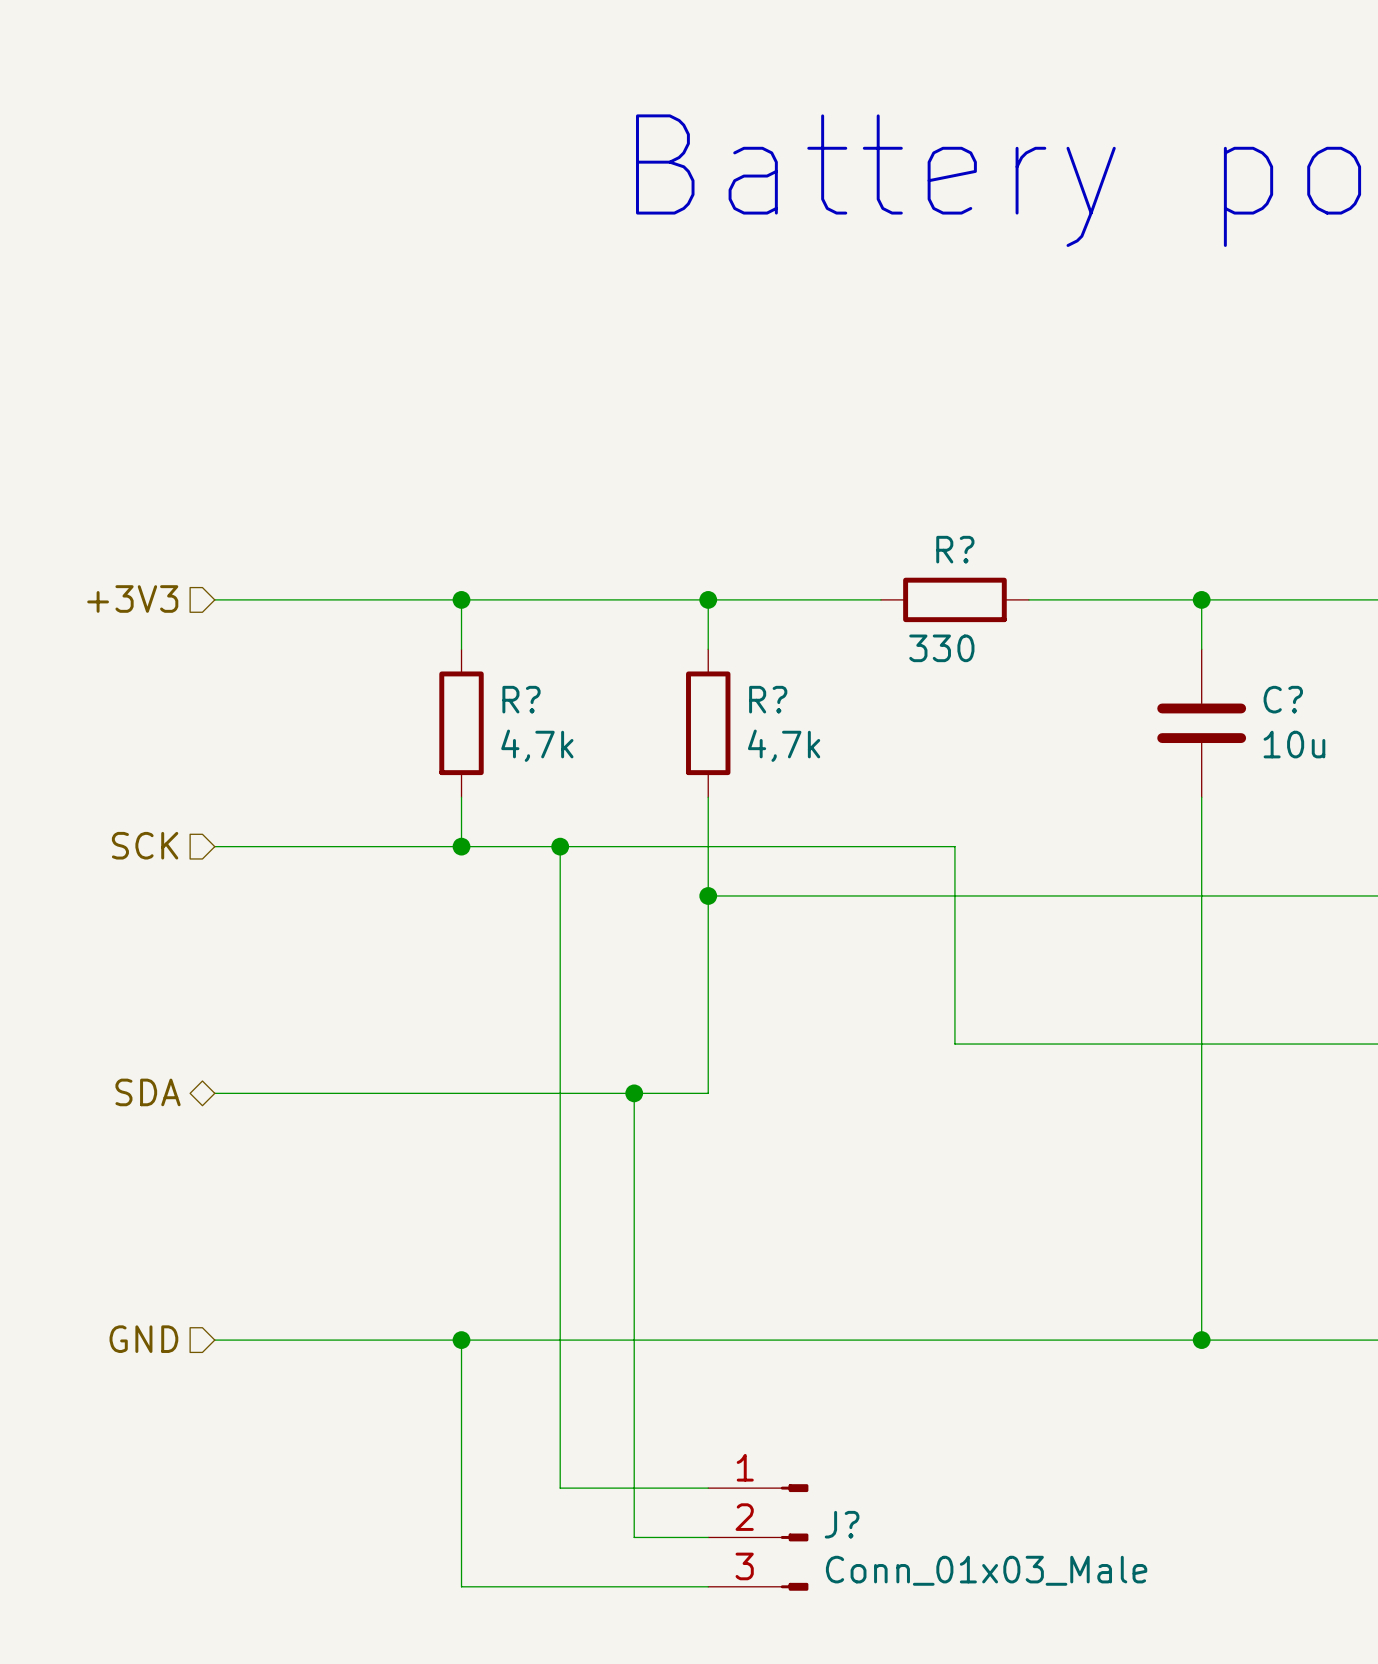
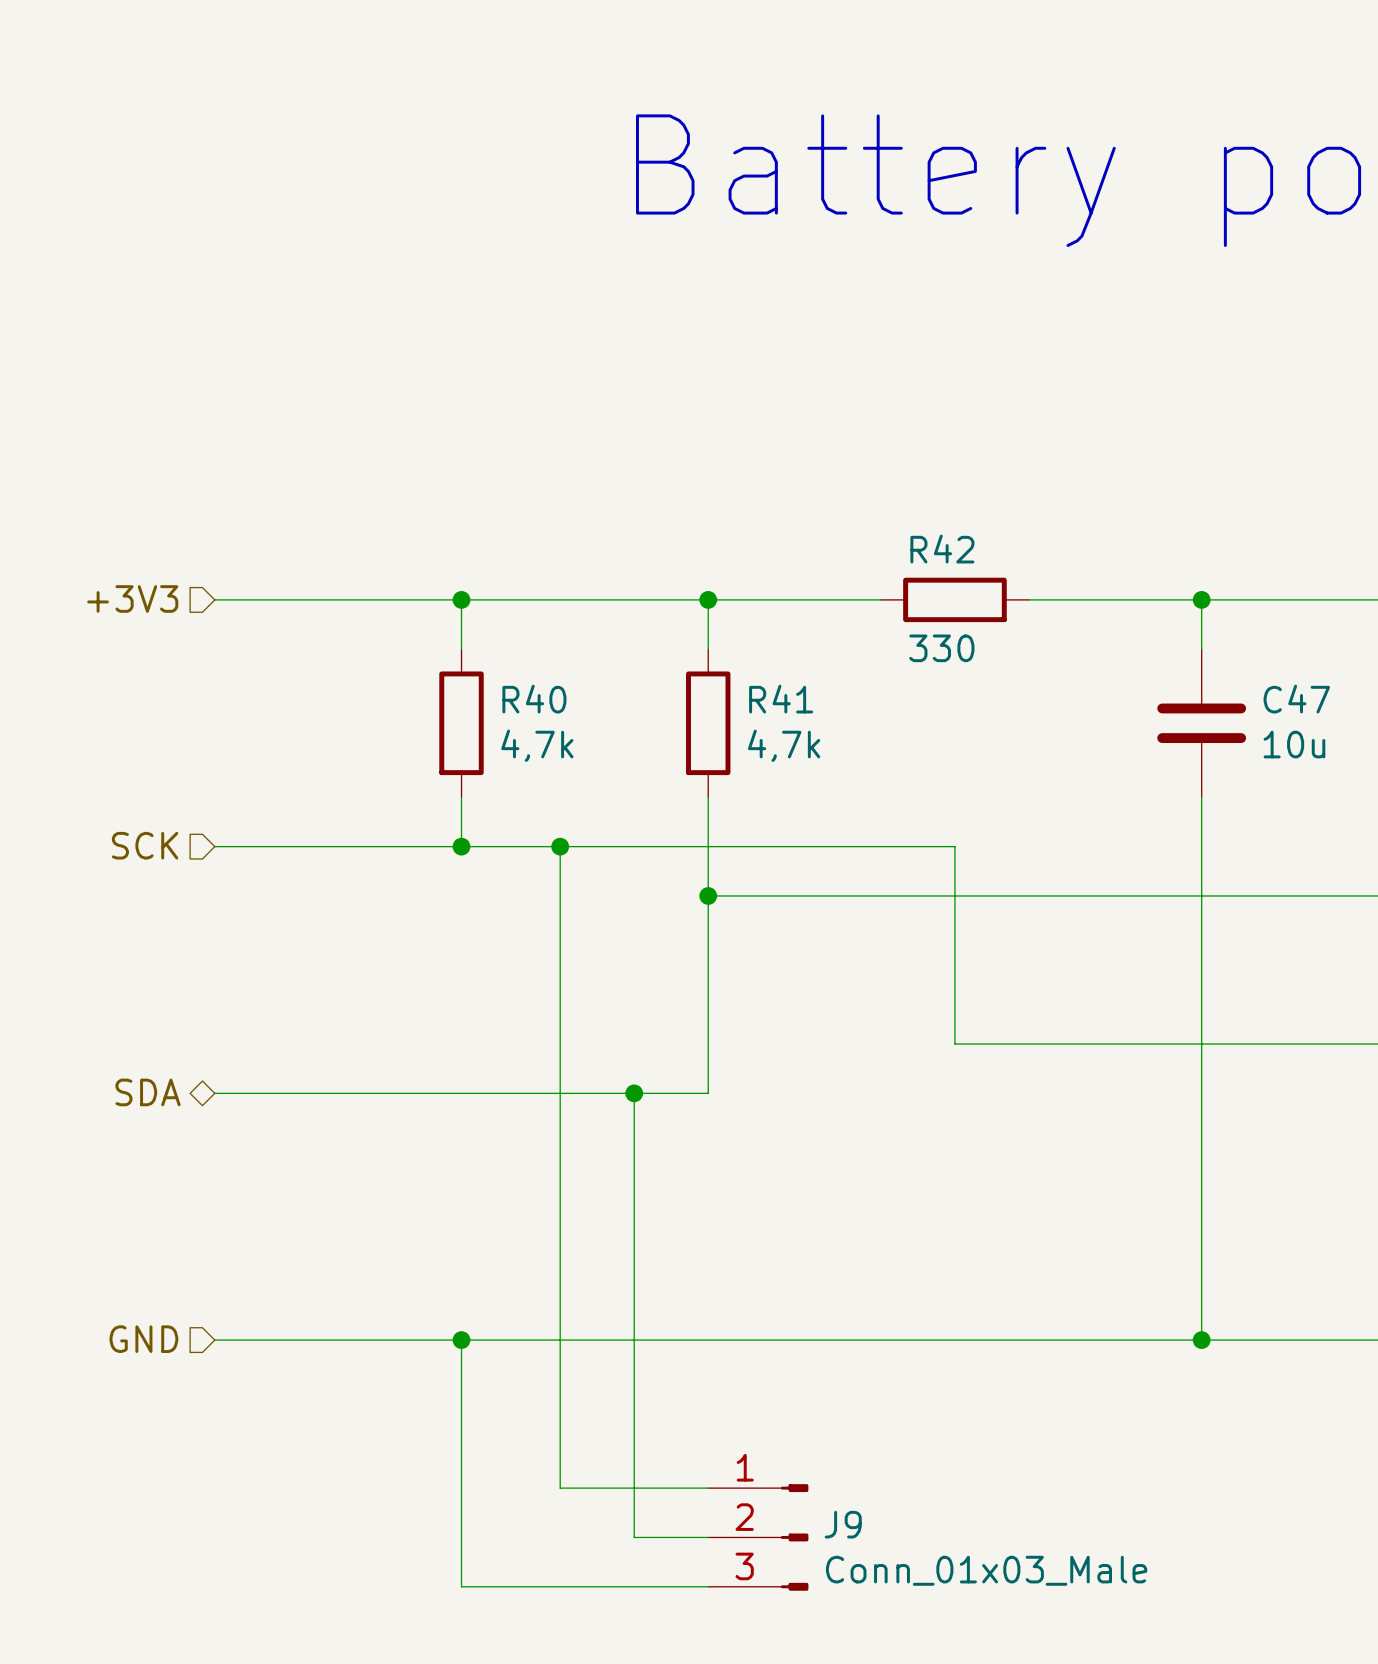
R? name: R? (955, 549) -> R42 (942, 549)
R? name: R? (521, 699) -> R40 (534, 699)
R? name: R? (768, 699) -> R41 (781, 699)
C? name: C? (1283, 699) -> C47 (1296, 699)
J? name: J? (842, 1524) -> J9 (843, 1524)

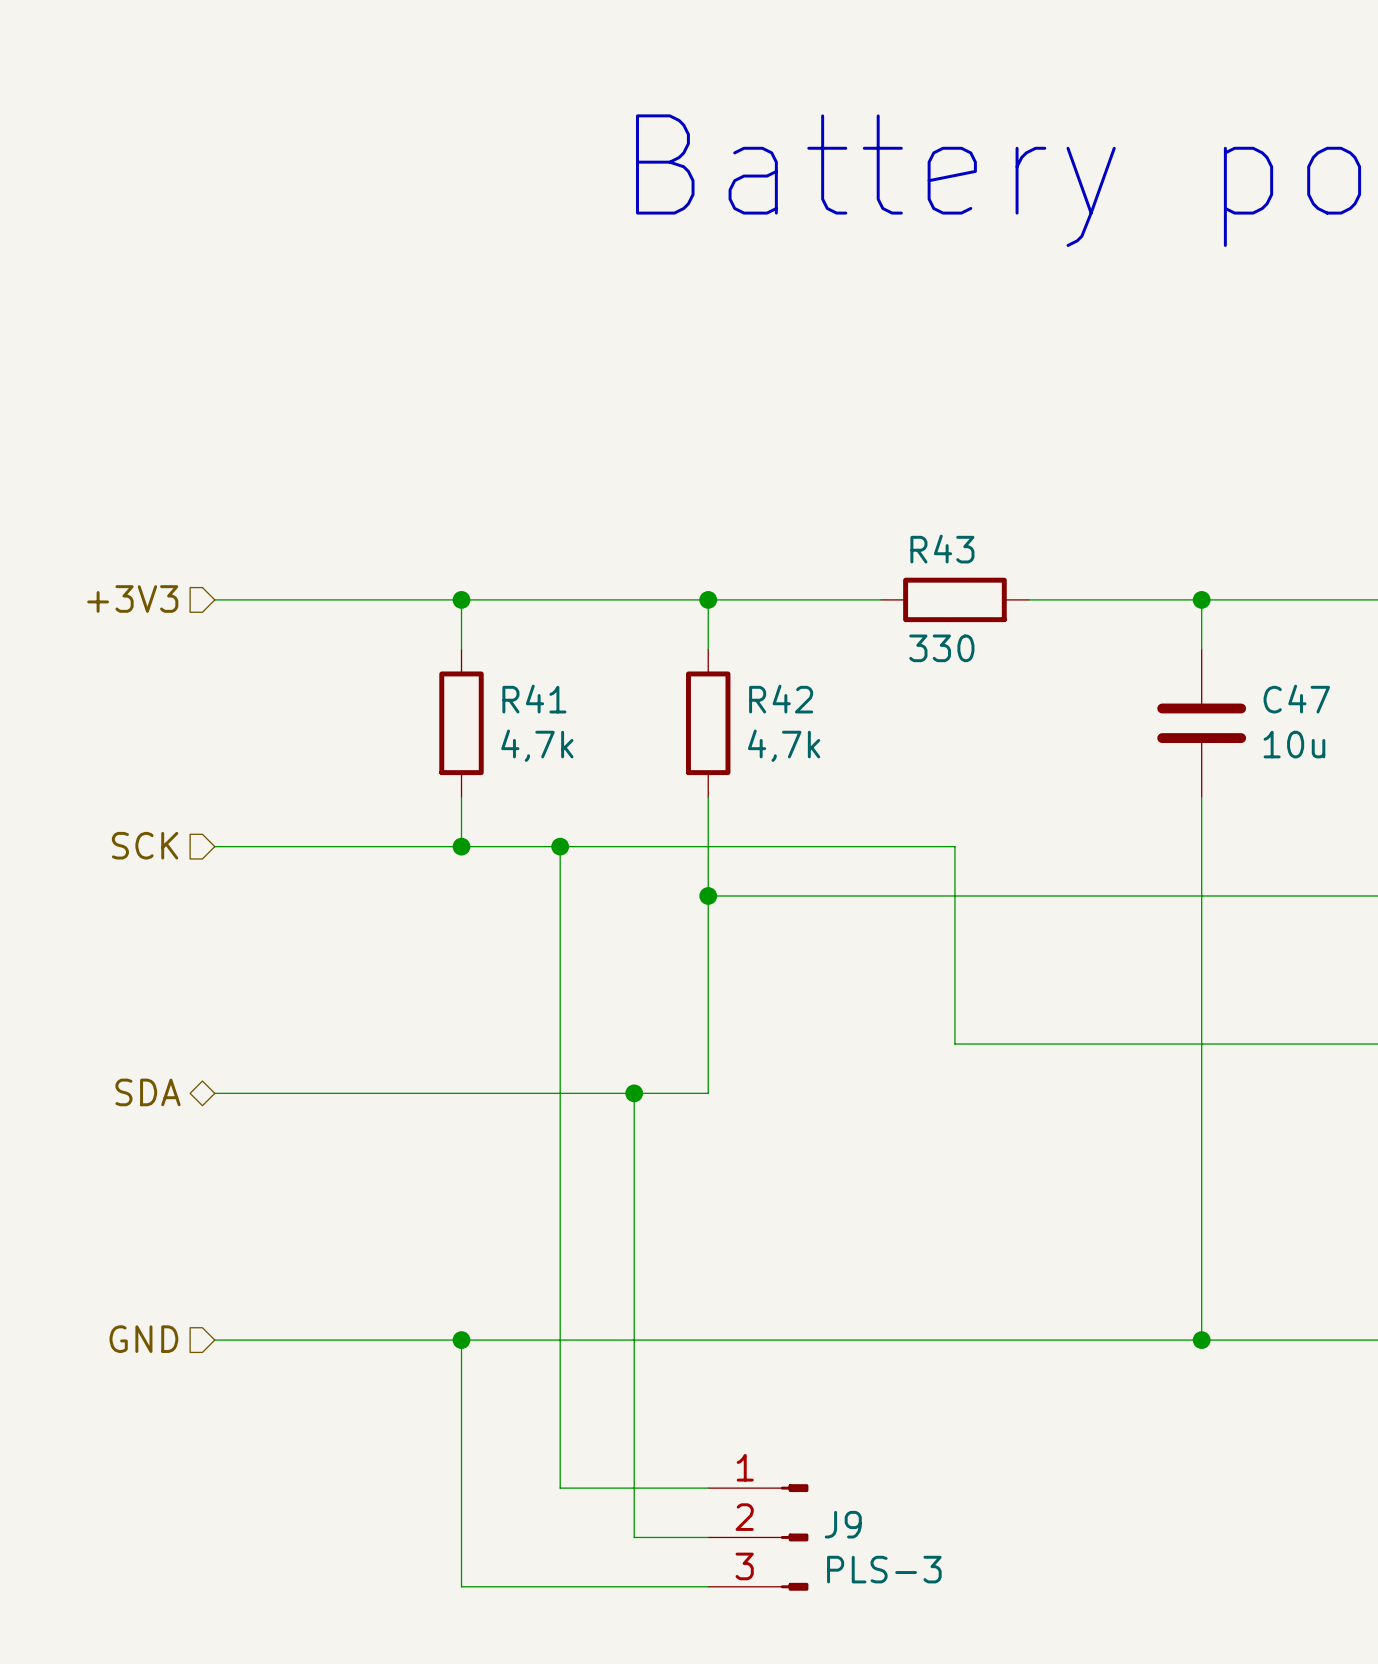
R42 name: R42 (942, 549) -> R43 (942, 549)
R40 name: R40 (534, 699) -> R41 (534, 699)
R41 name: R41 (781, 699) -> R42 (781, 699)
J9 value: Conn_01x03_Male (986, 1570) -> PLS-3 (884, 1569)

